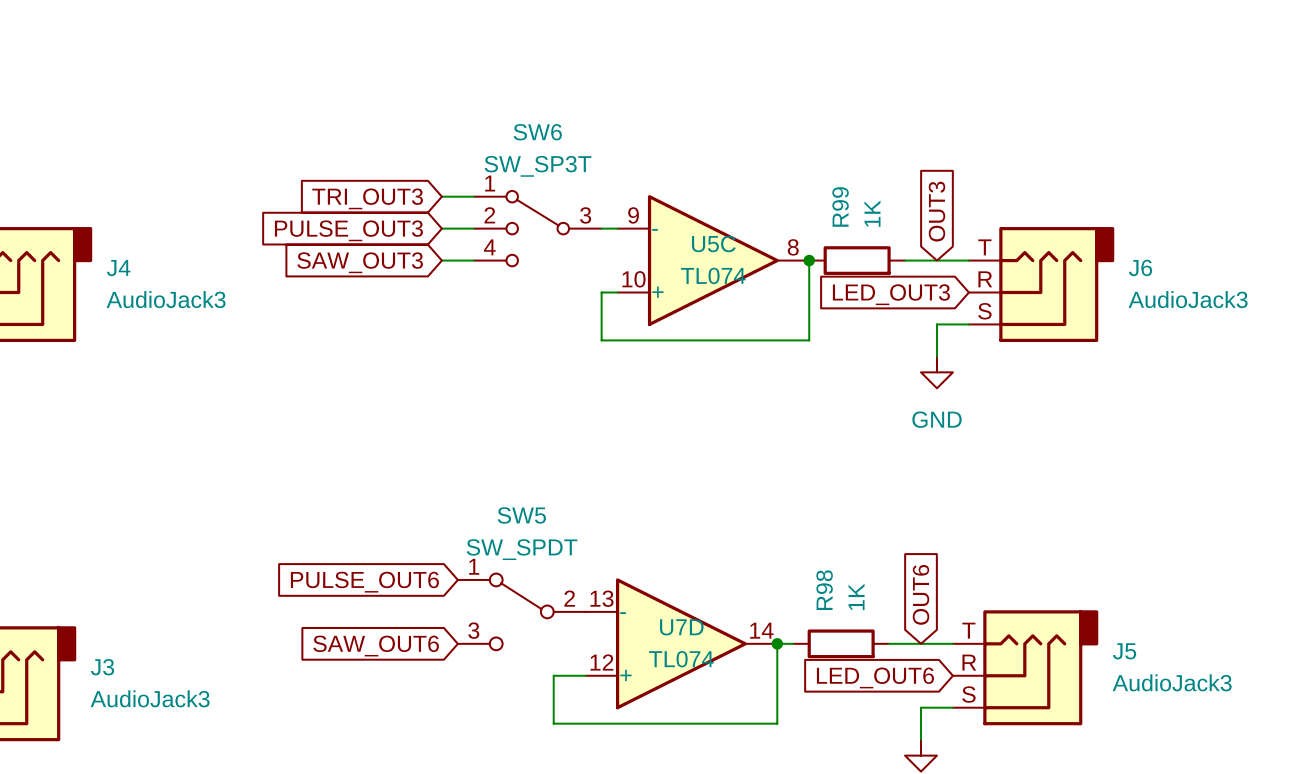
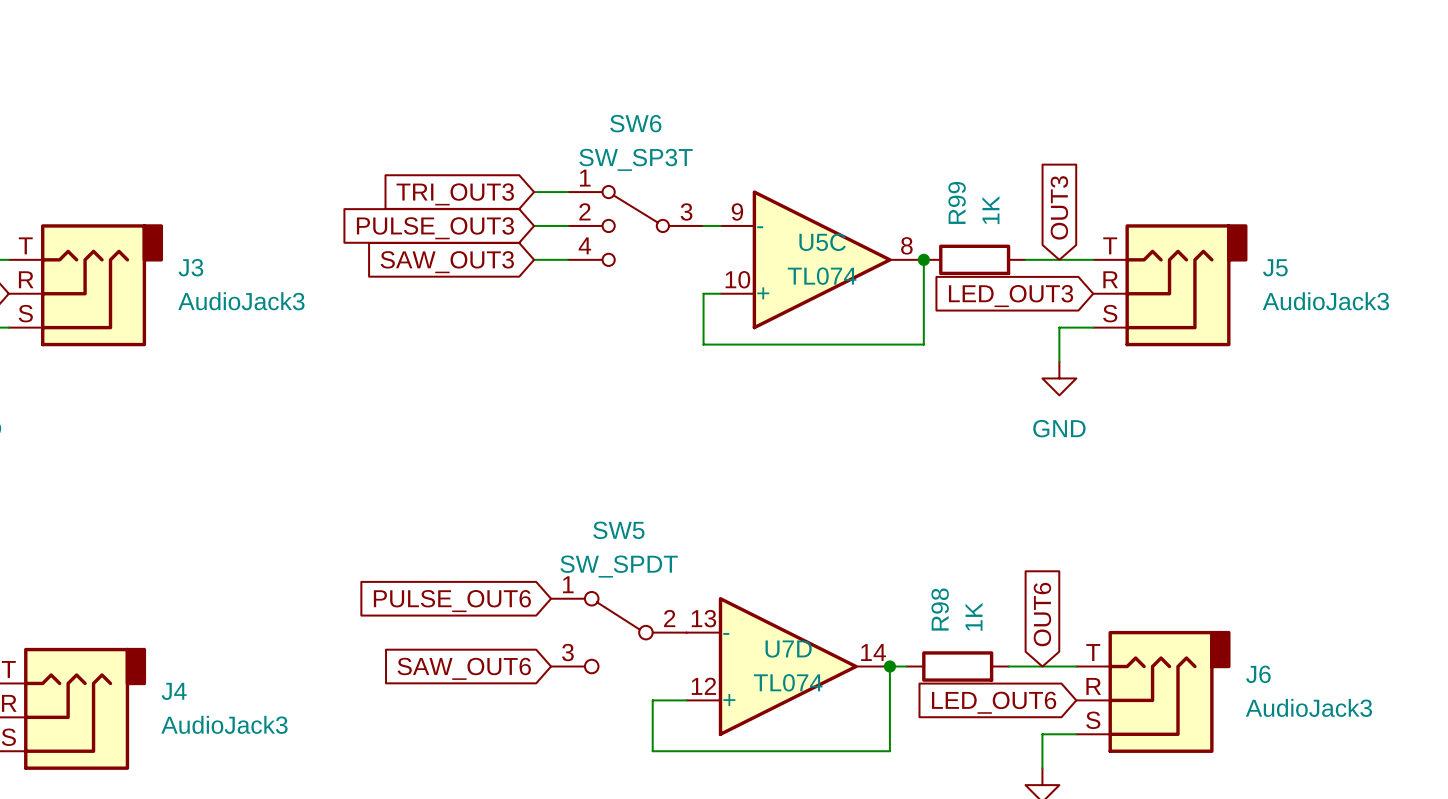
J6 name: J6 (1140, 267) -> J5 (1275, 267)
J4 name: J4 (118, 268) -> J3 (190, 267)
J5 name: J5 (1124, 651) -> J6 (1258, 674)
J3 name: J3 (102, 667) -> J4 (174, 691)

